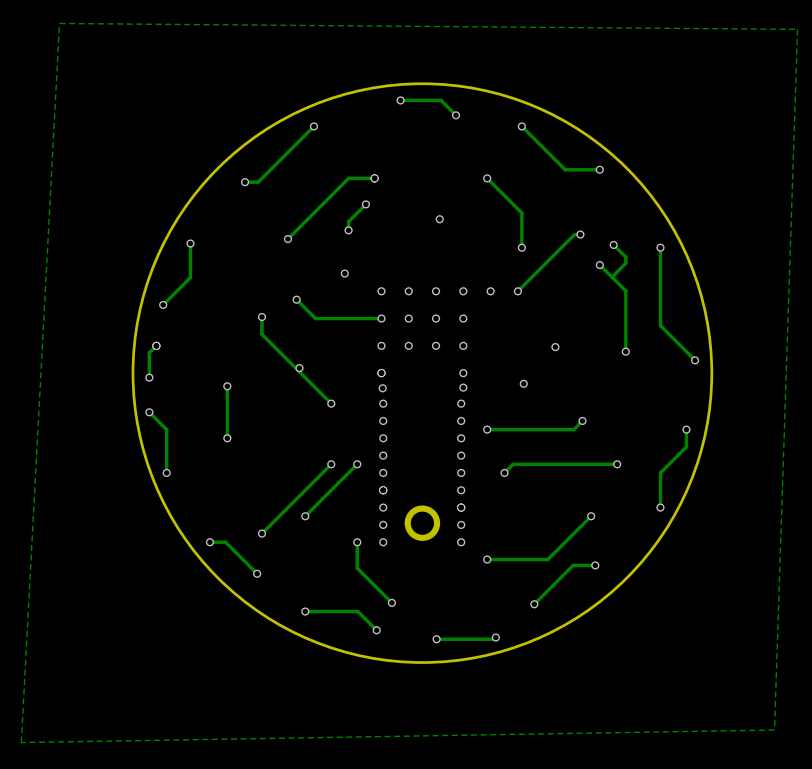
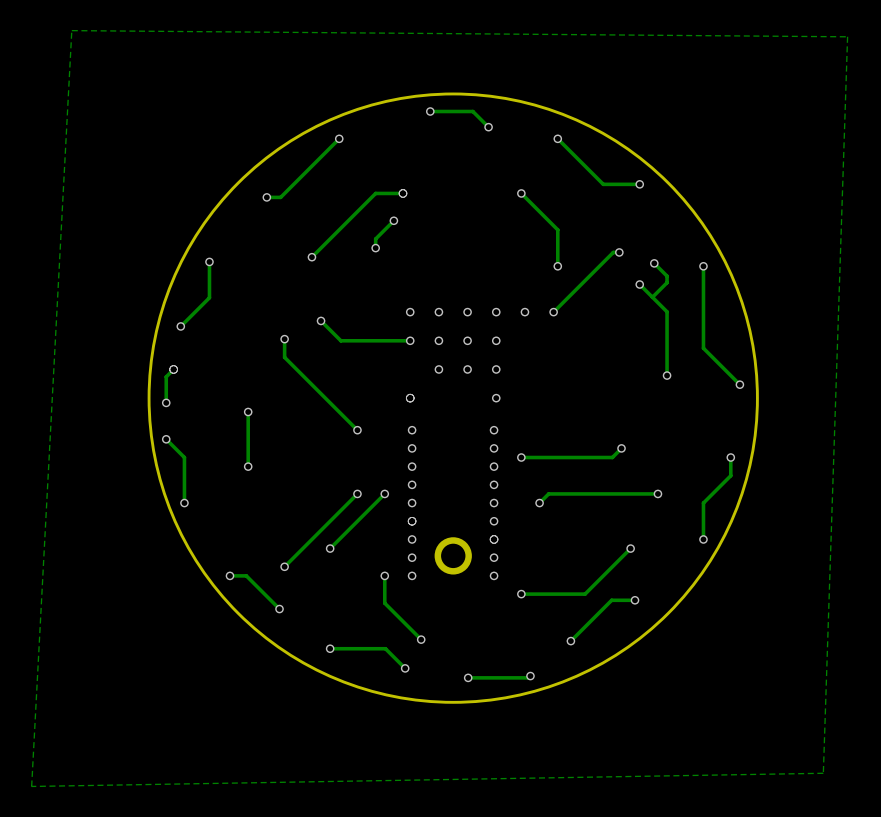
via: (439, 219) -> none
via: (344, 273) -> none
via: (381, 345) -> none
via: (555, 347) -> none
via: (299, 368) -> none
via: (523, 383) -> none
via: (463, 387) -> none
via: (382, 388) -> none

